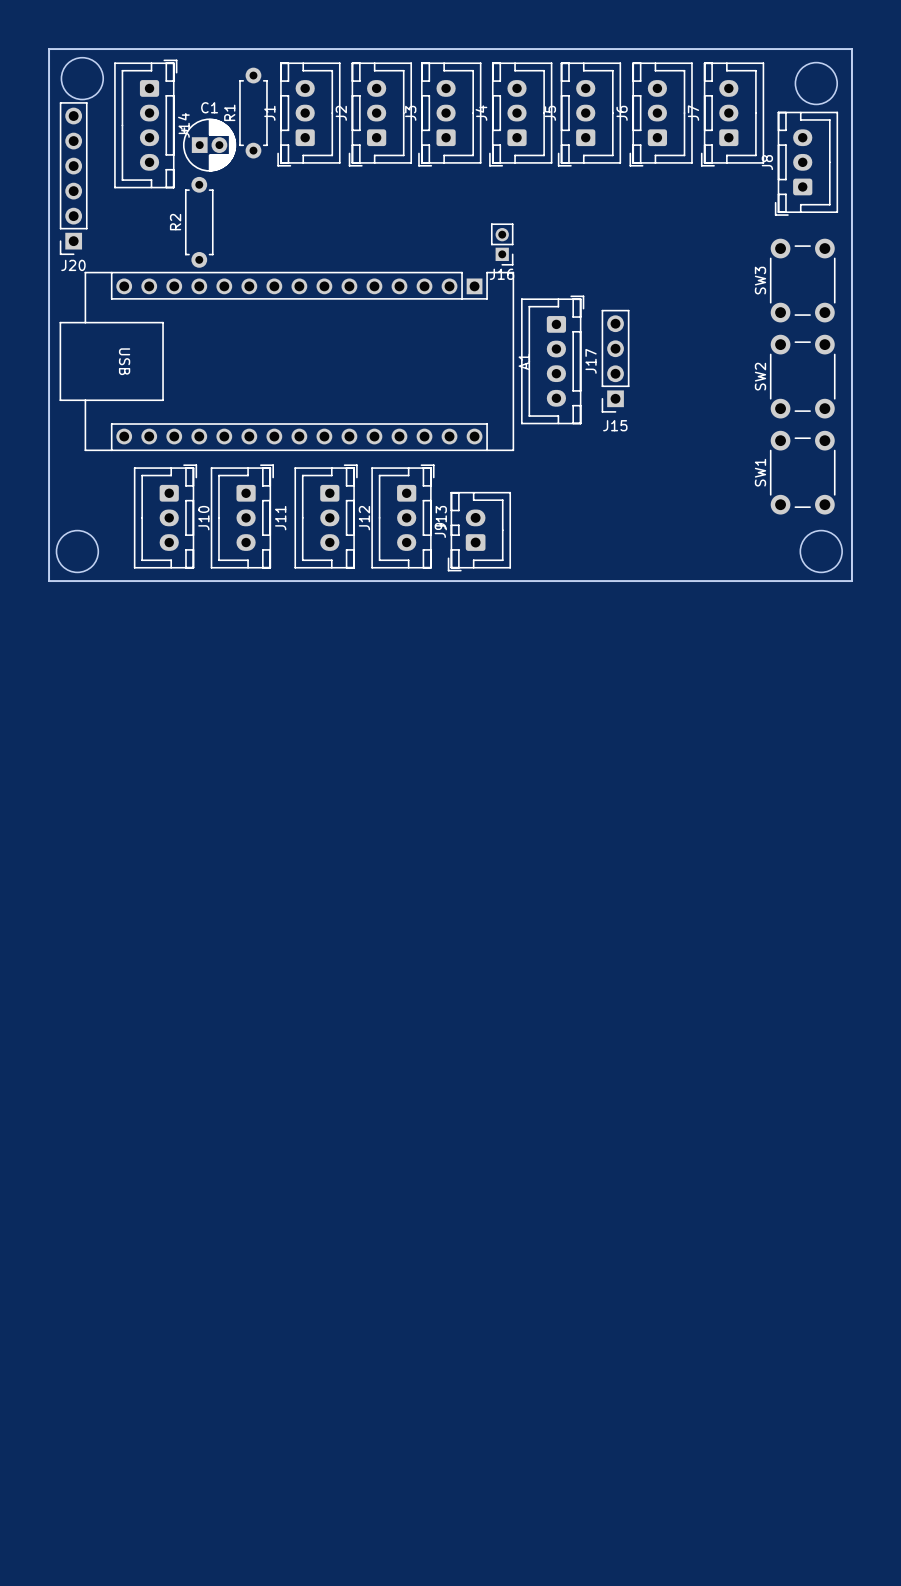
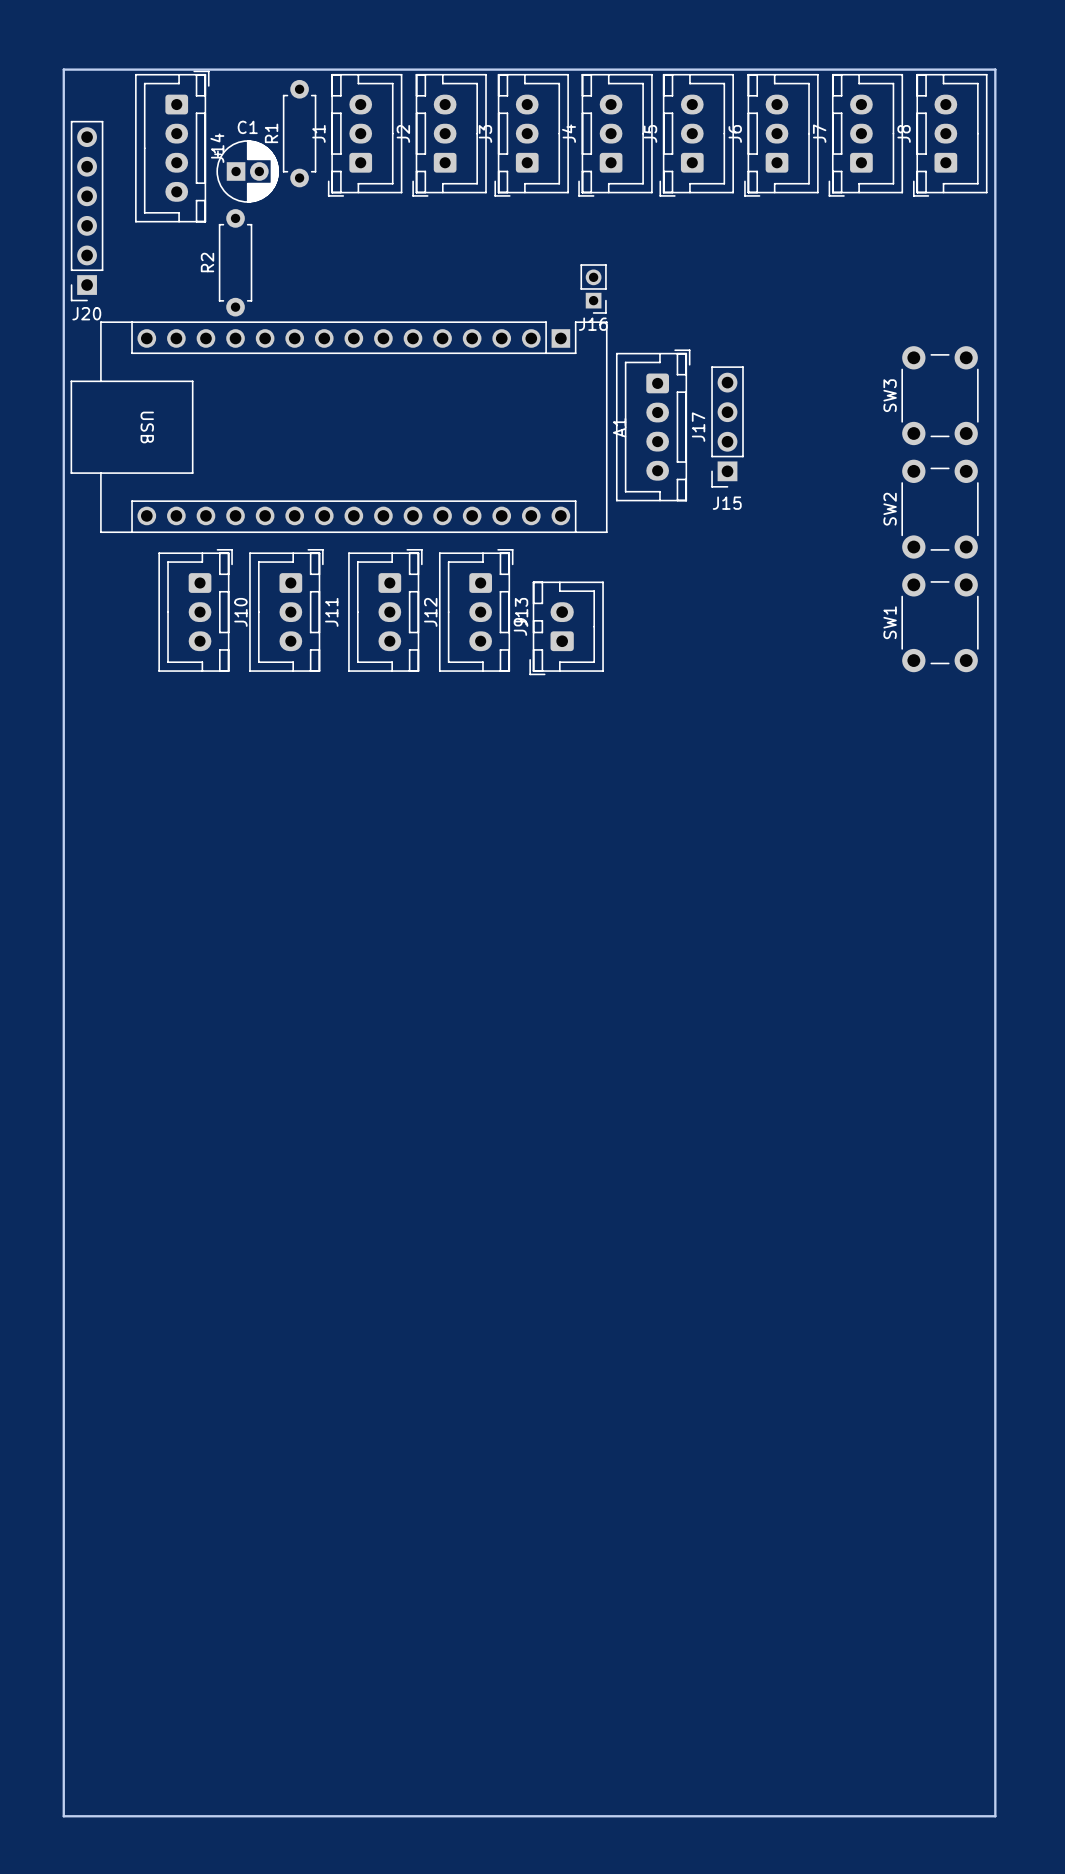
board edge: (49, 49) (851, 49) (851, 581) (49, 581) (49, 49) -> none
round board edge: [61, 57, 104, 100] -> none
board edge: none -> (63, 69) (995, 69) (995, 1816) (63, 1816) (63, 69)
round board edge: [795, 62, 838, 105] -> none
J8 position: (806, 163) -> (950, 135)
SW3 position: (802, 280) -> (940, 395)
SW2 position: (802, 376) -> (940, 509)
SW1 position: (802, 472) -> (940, 622)
round board edge: [56, 530, 99, 573] -> none
round board edge: [800, 530, 843, 573] -> none

